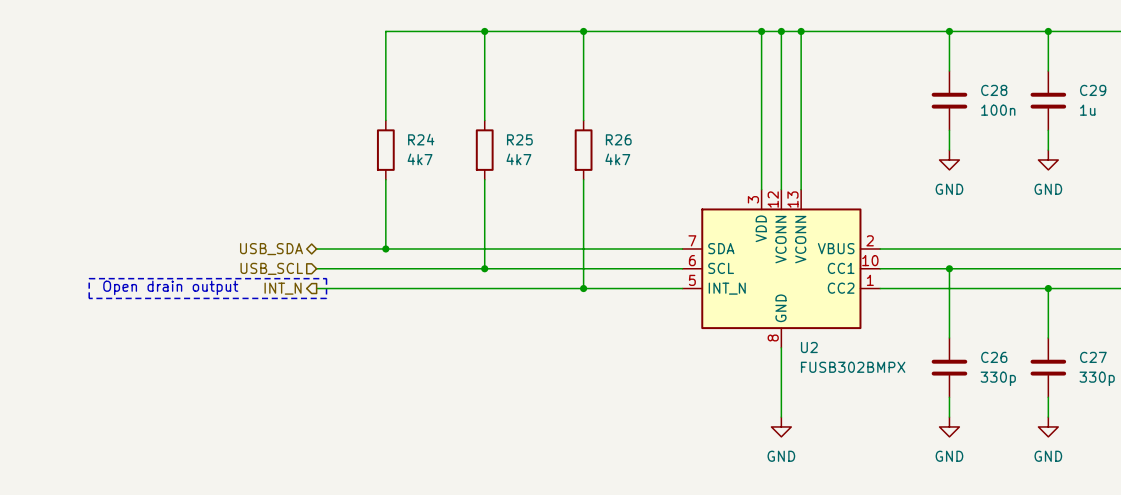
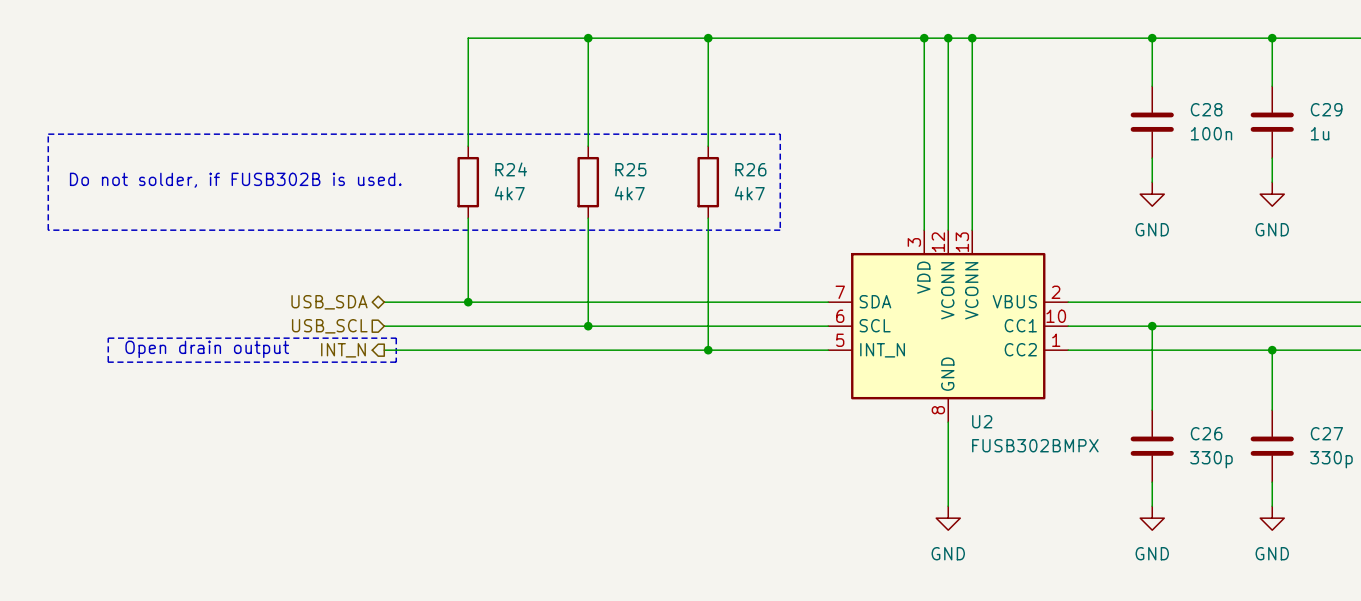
line: none -> (48, 134) (780, 134) (780, 230) (48, 230) (48, 134)
text: none -> Do not solder, if FUSB302B is used. (235, 180)

